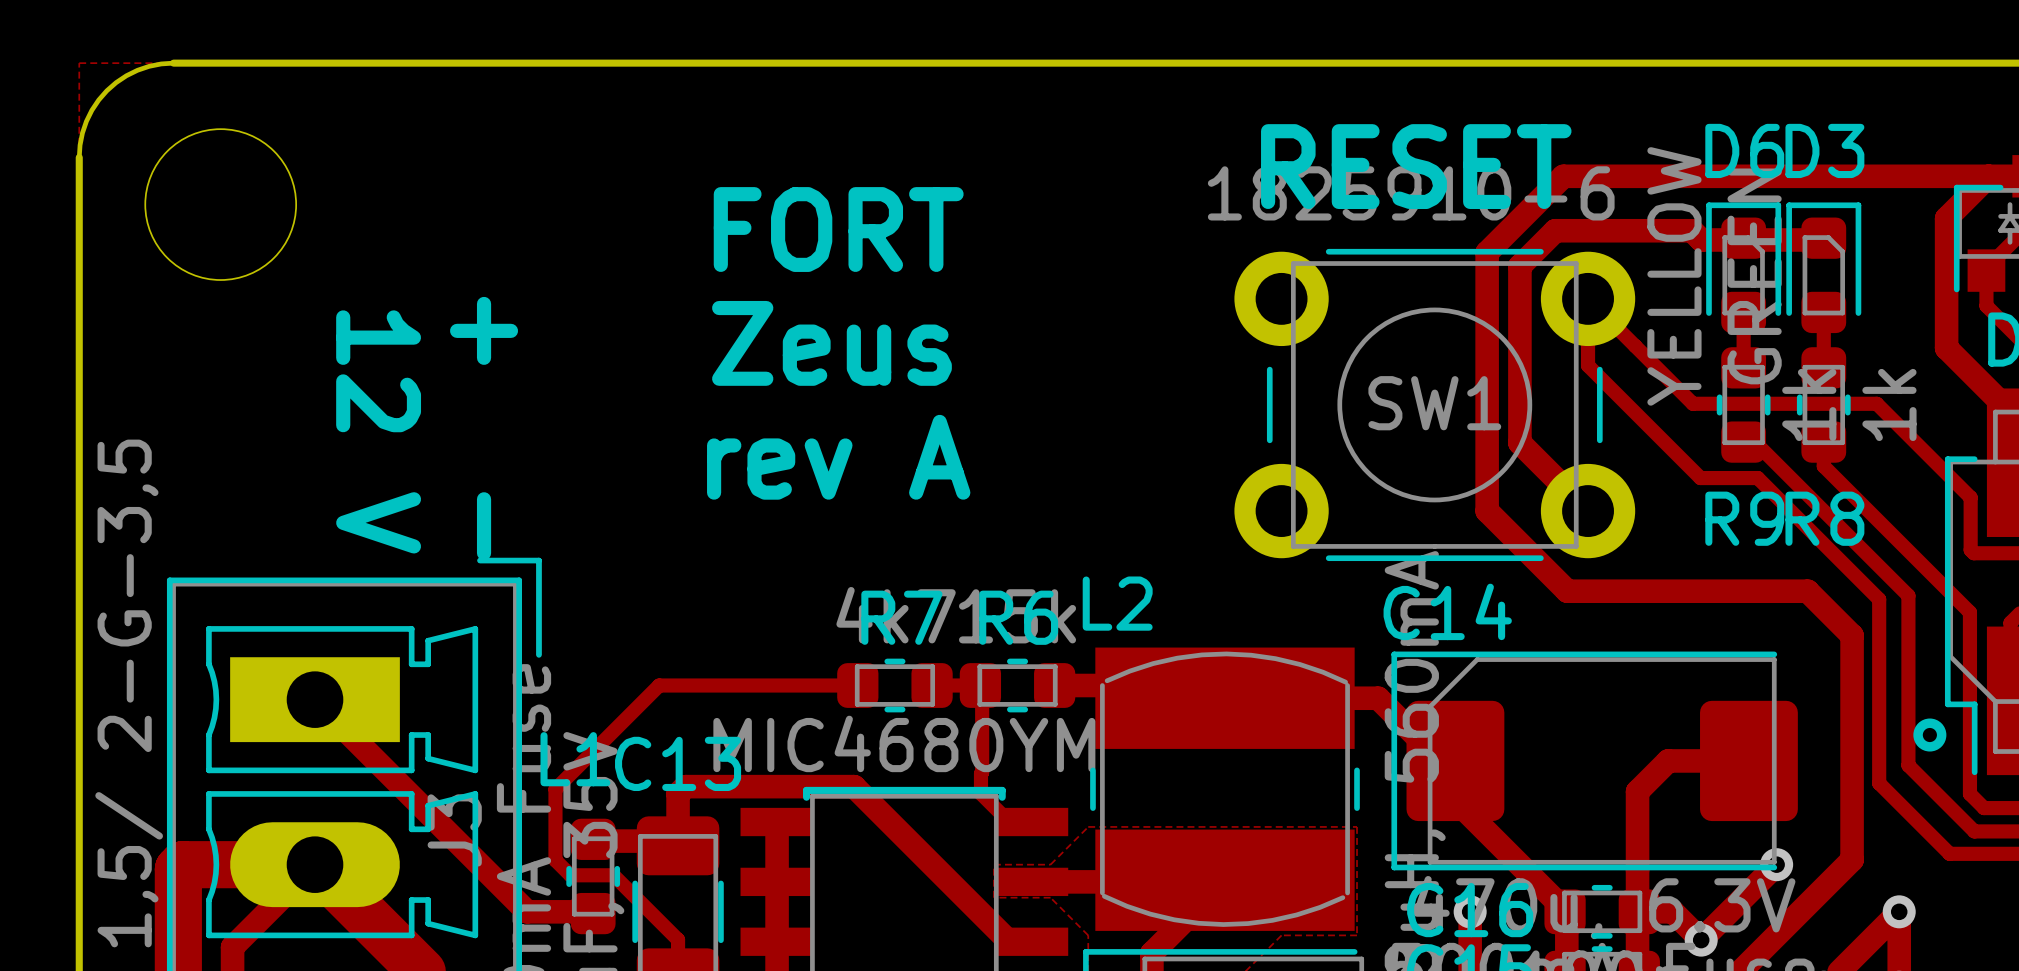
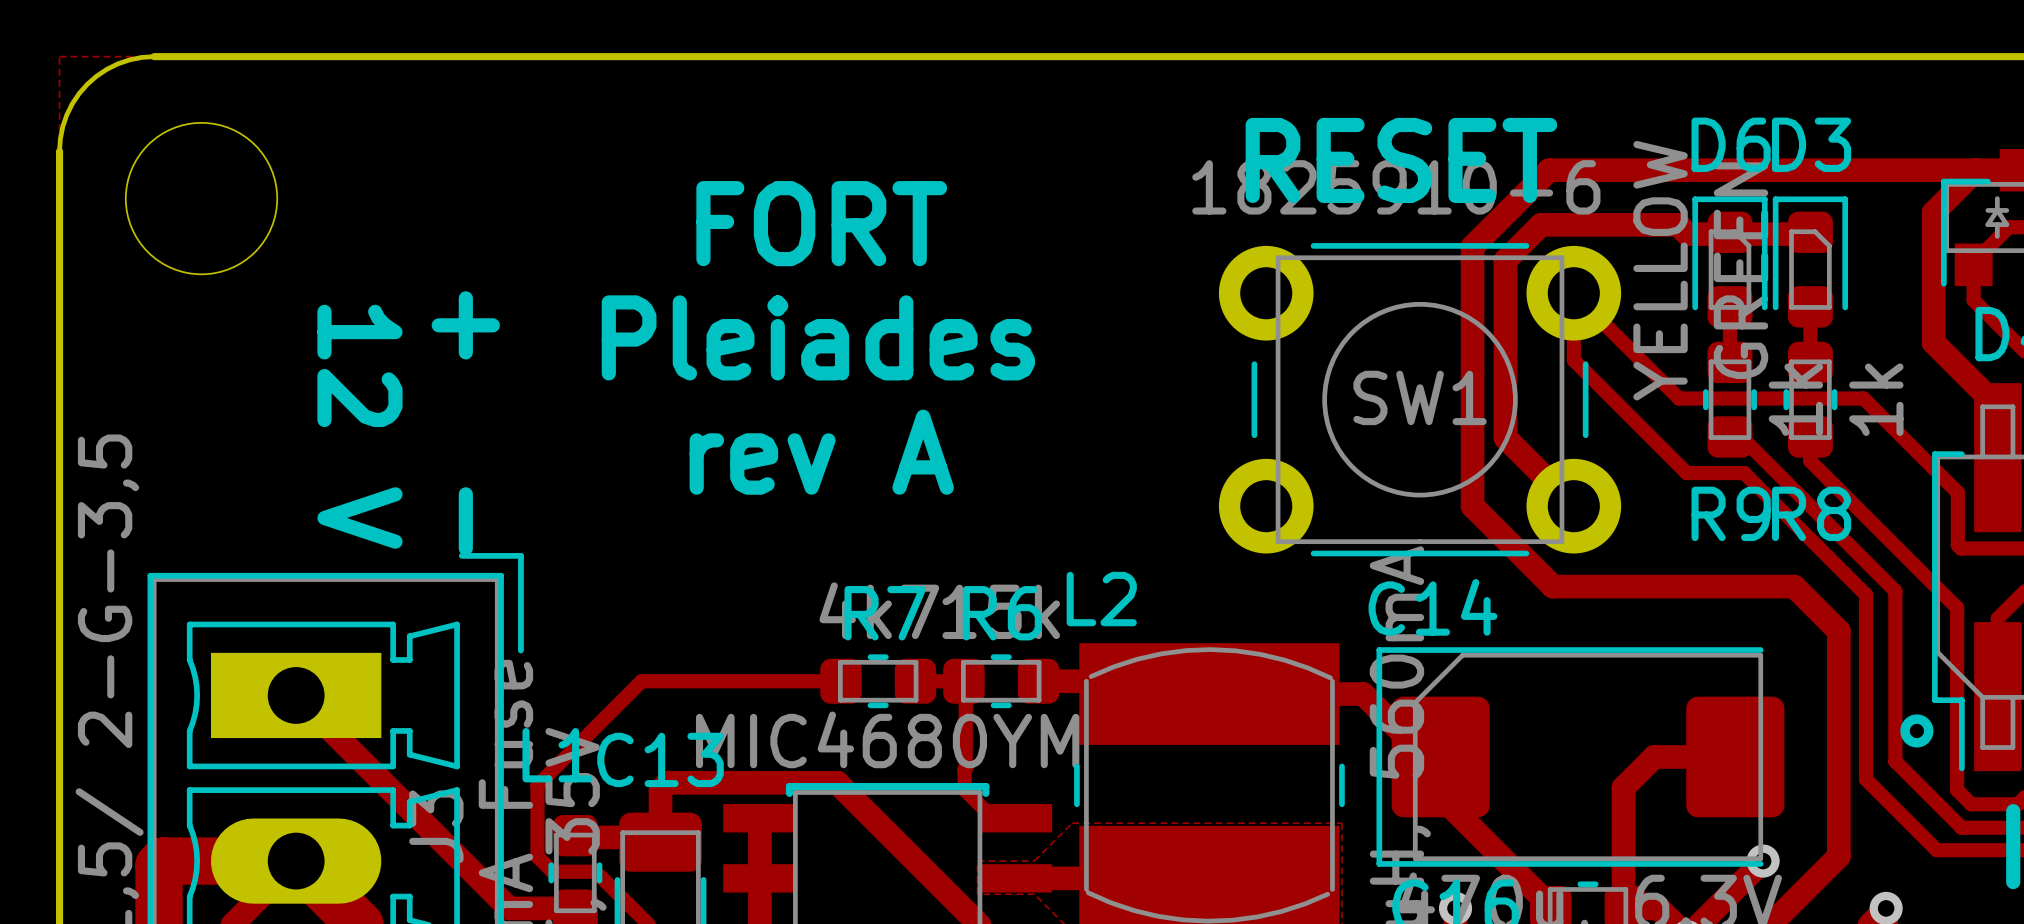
text: Zeus (831, 343) -> Pleiades (818, 337)

